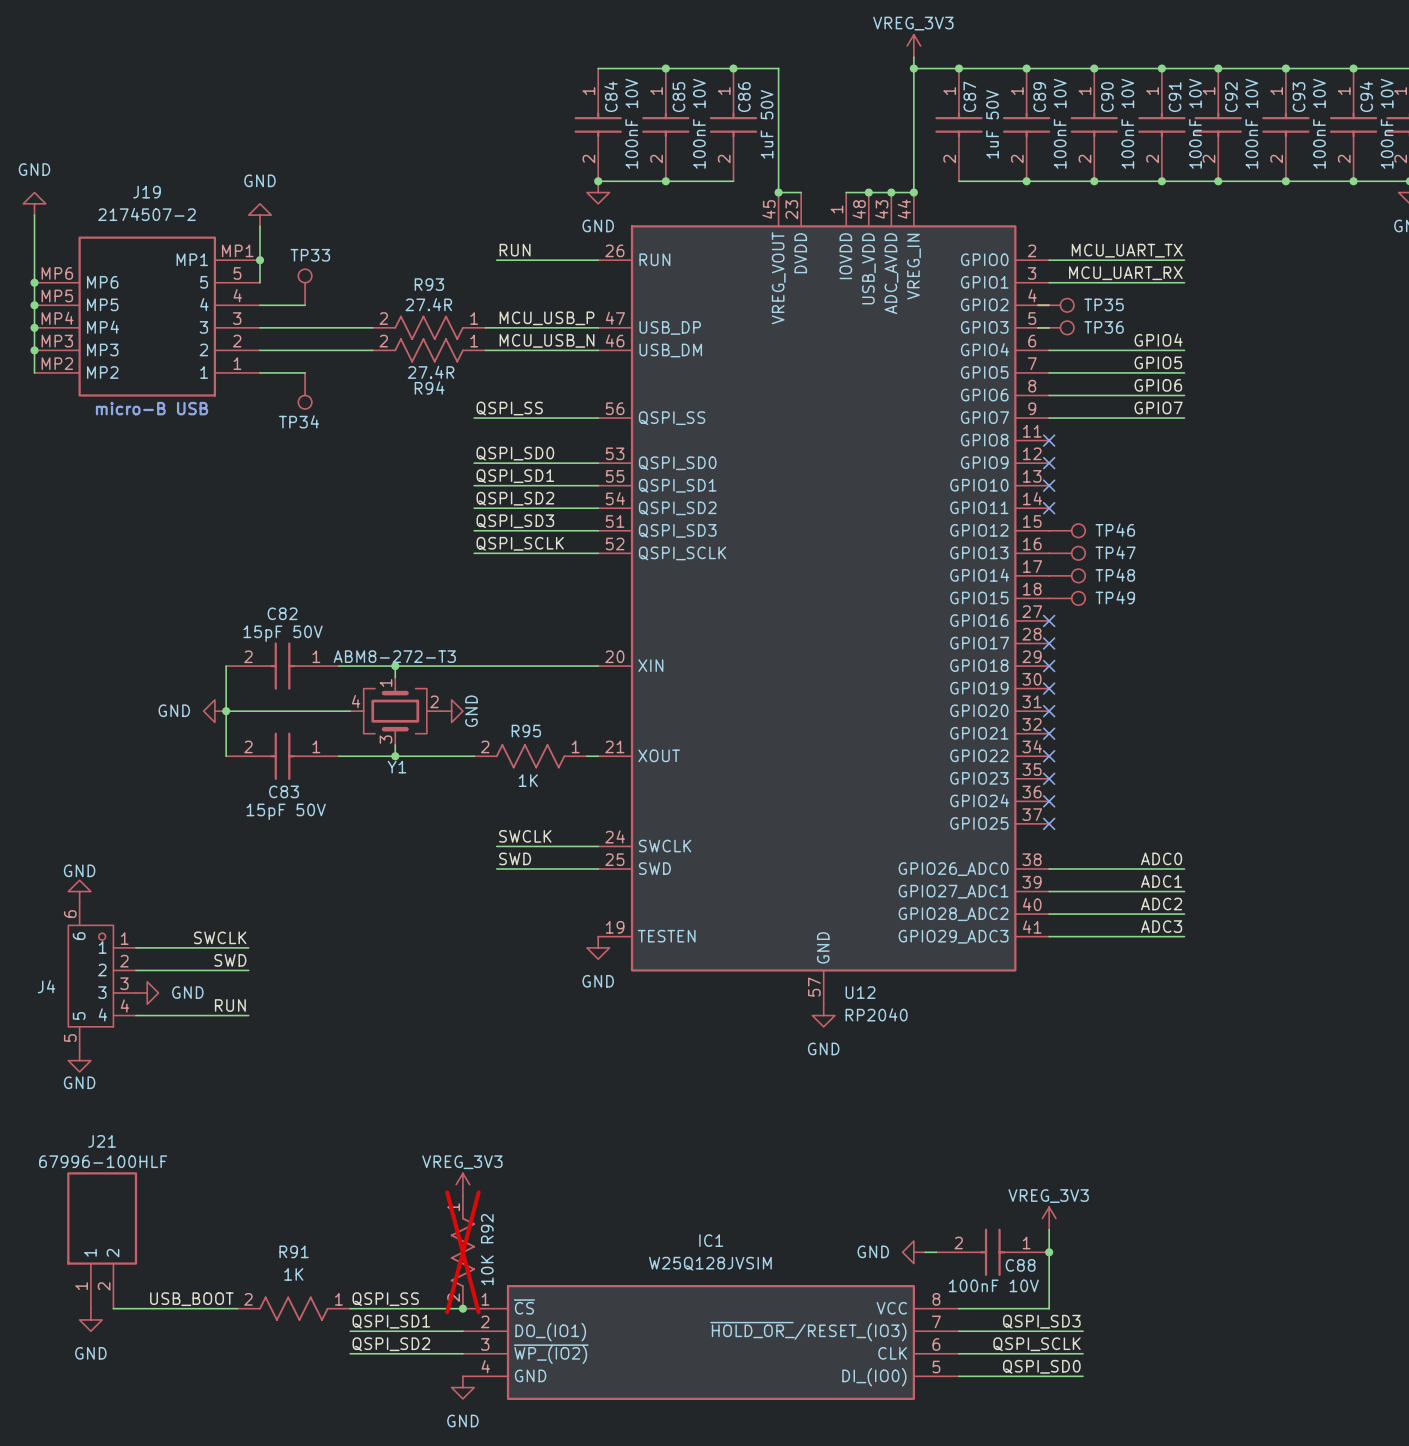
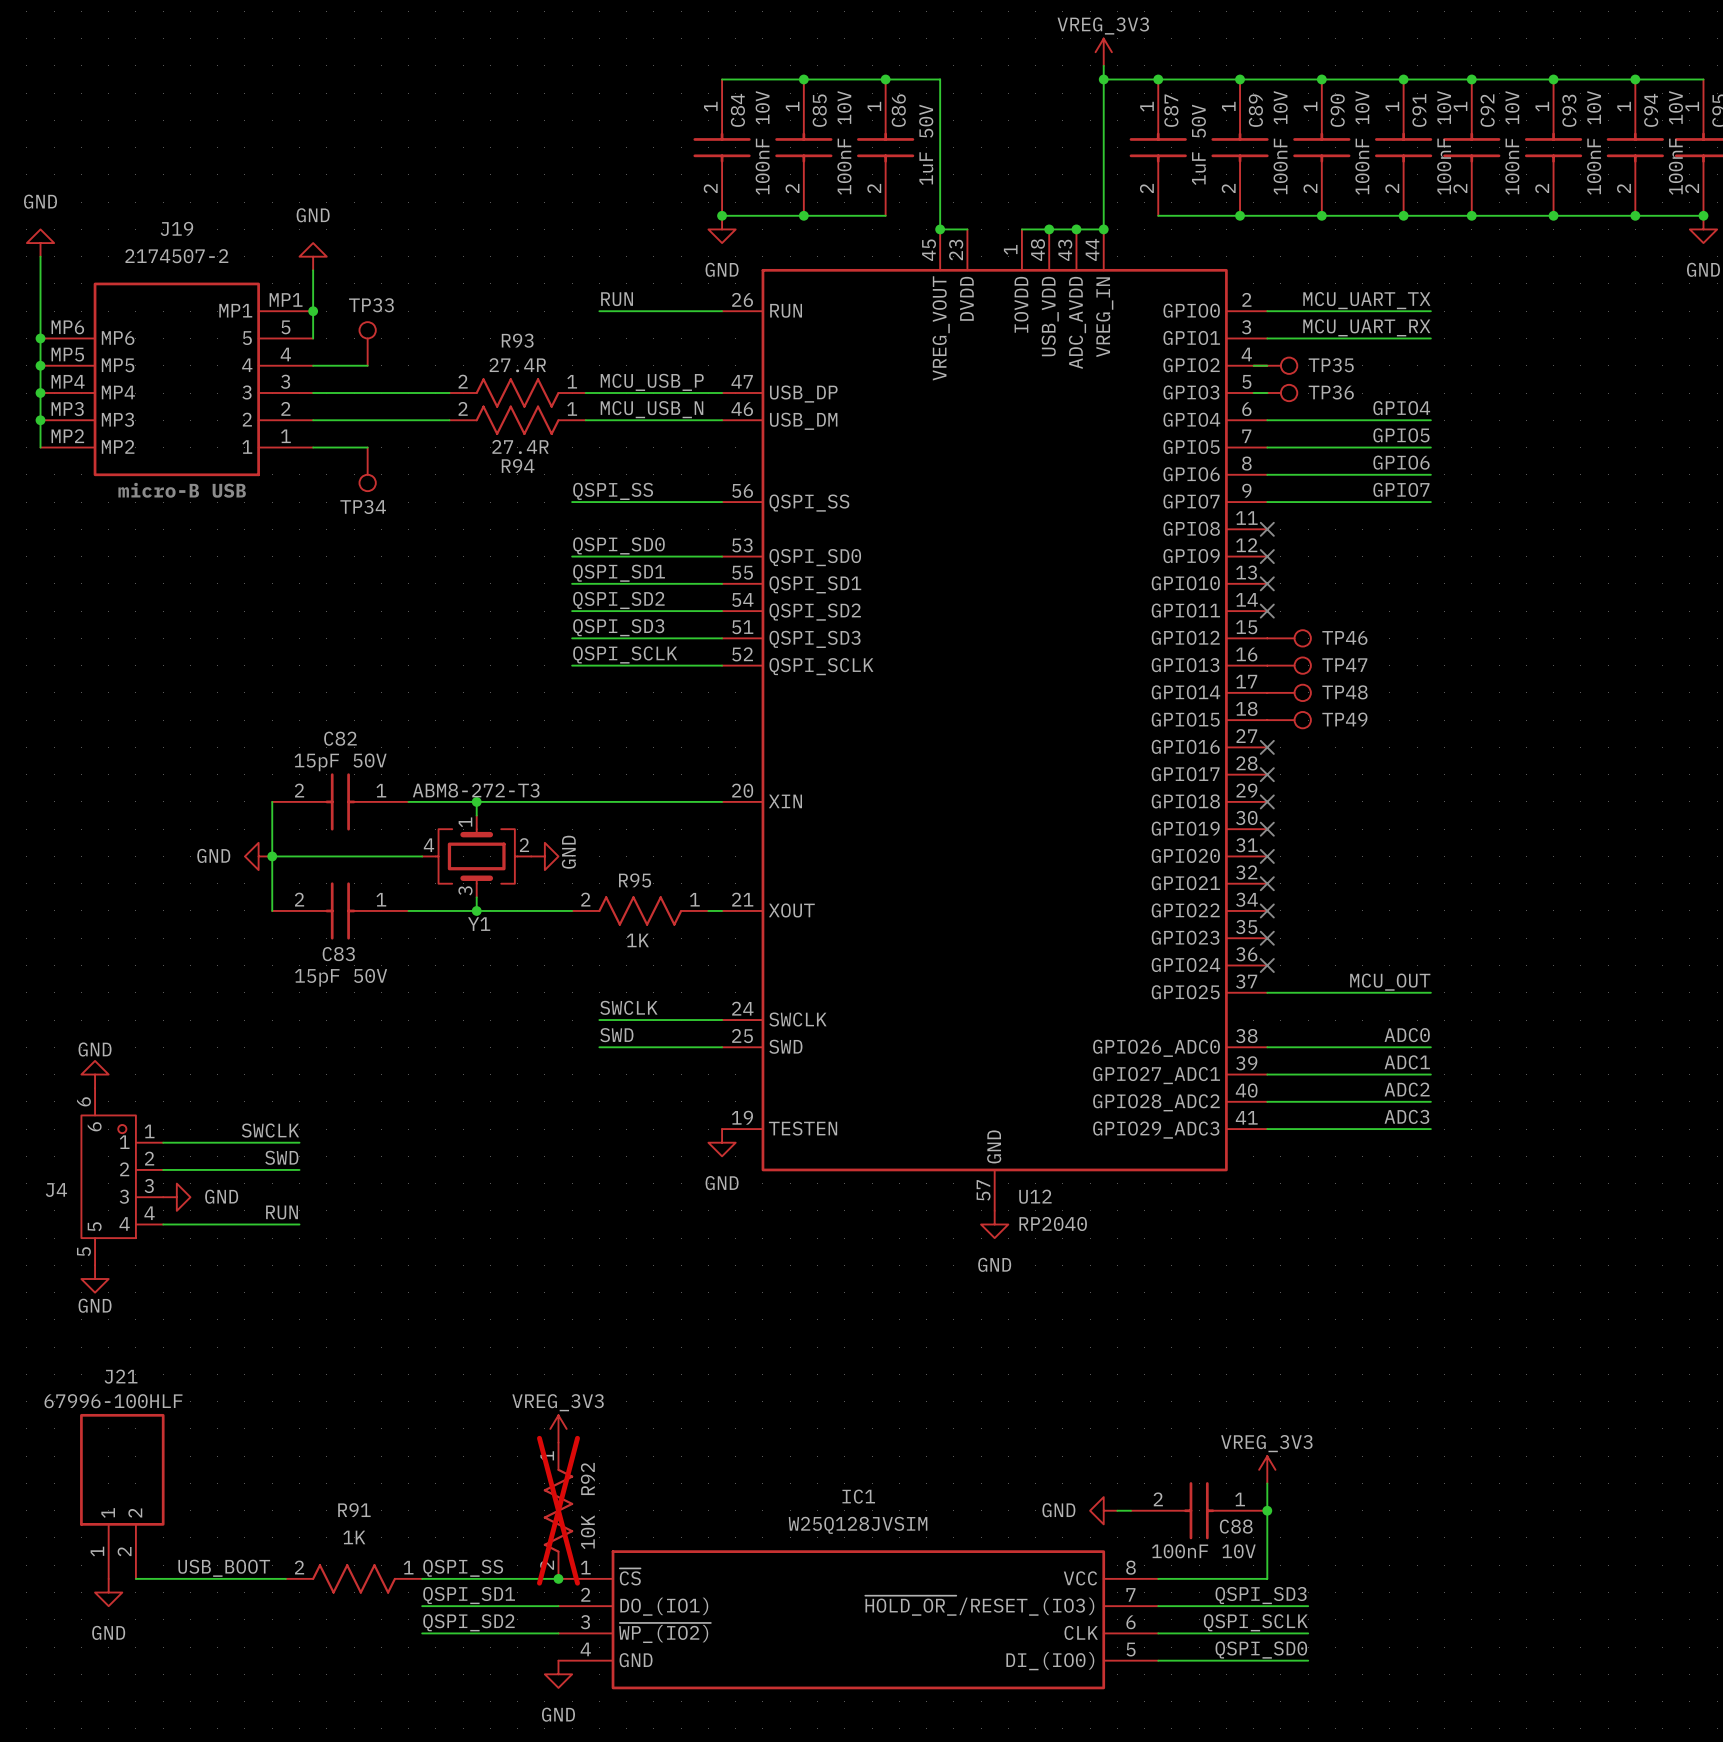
label: none -> MCU_OUT (1390, 982)
wire: none -> (1267, 992) (1430, 992)
no-connect mark: (1049, 823) -> none

